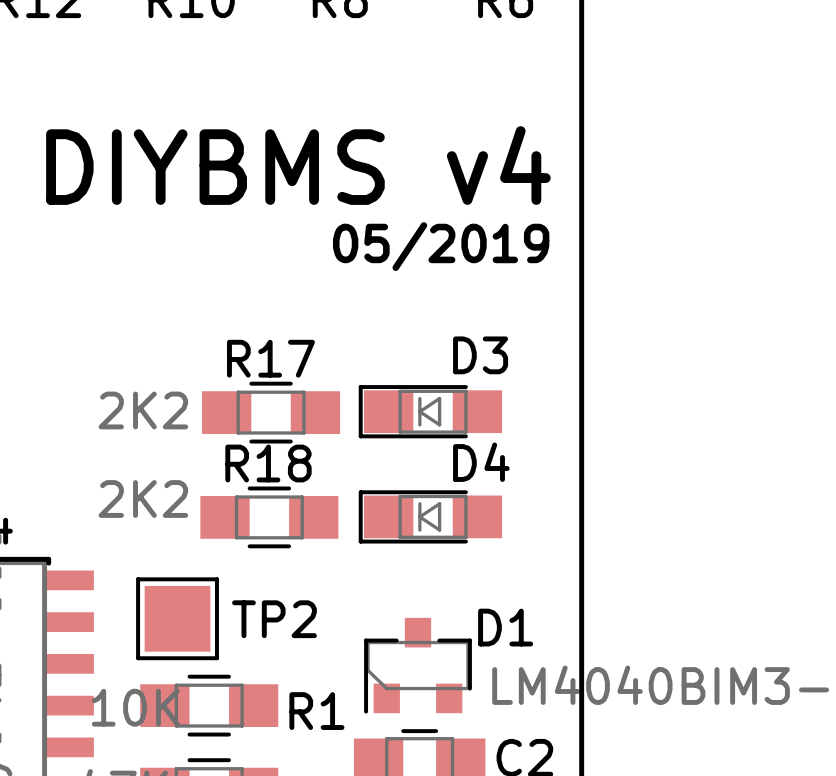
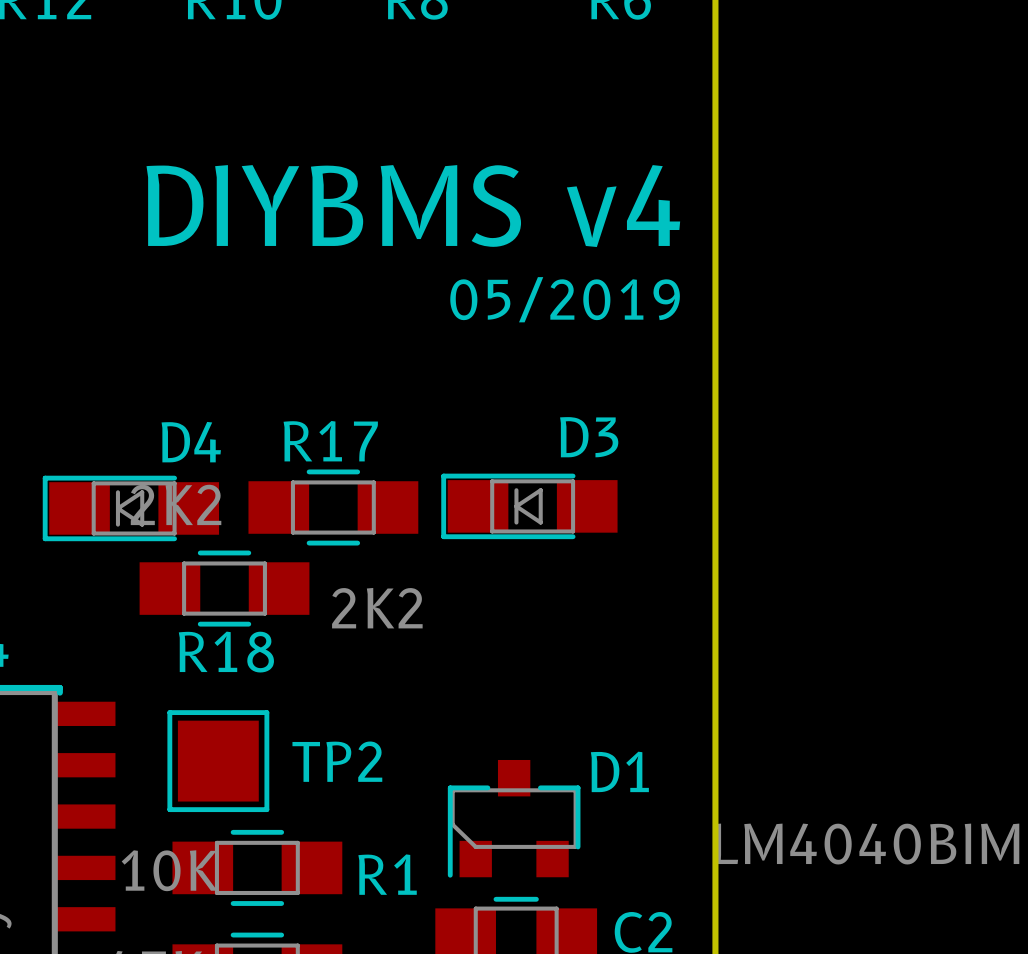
R18 name position: R18 (268, 463) -> R18 (226, 652)
R18 value position: 2K2 (143, 498) -> 2K2 (377, 608)
D4 position: (430, 516) -> (130, 508)
R18 position: (269, 517) -> (224, 588)

